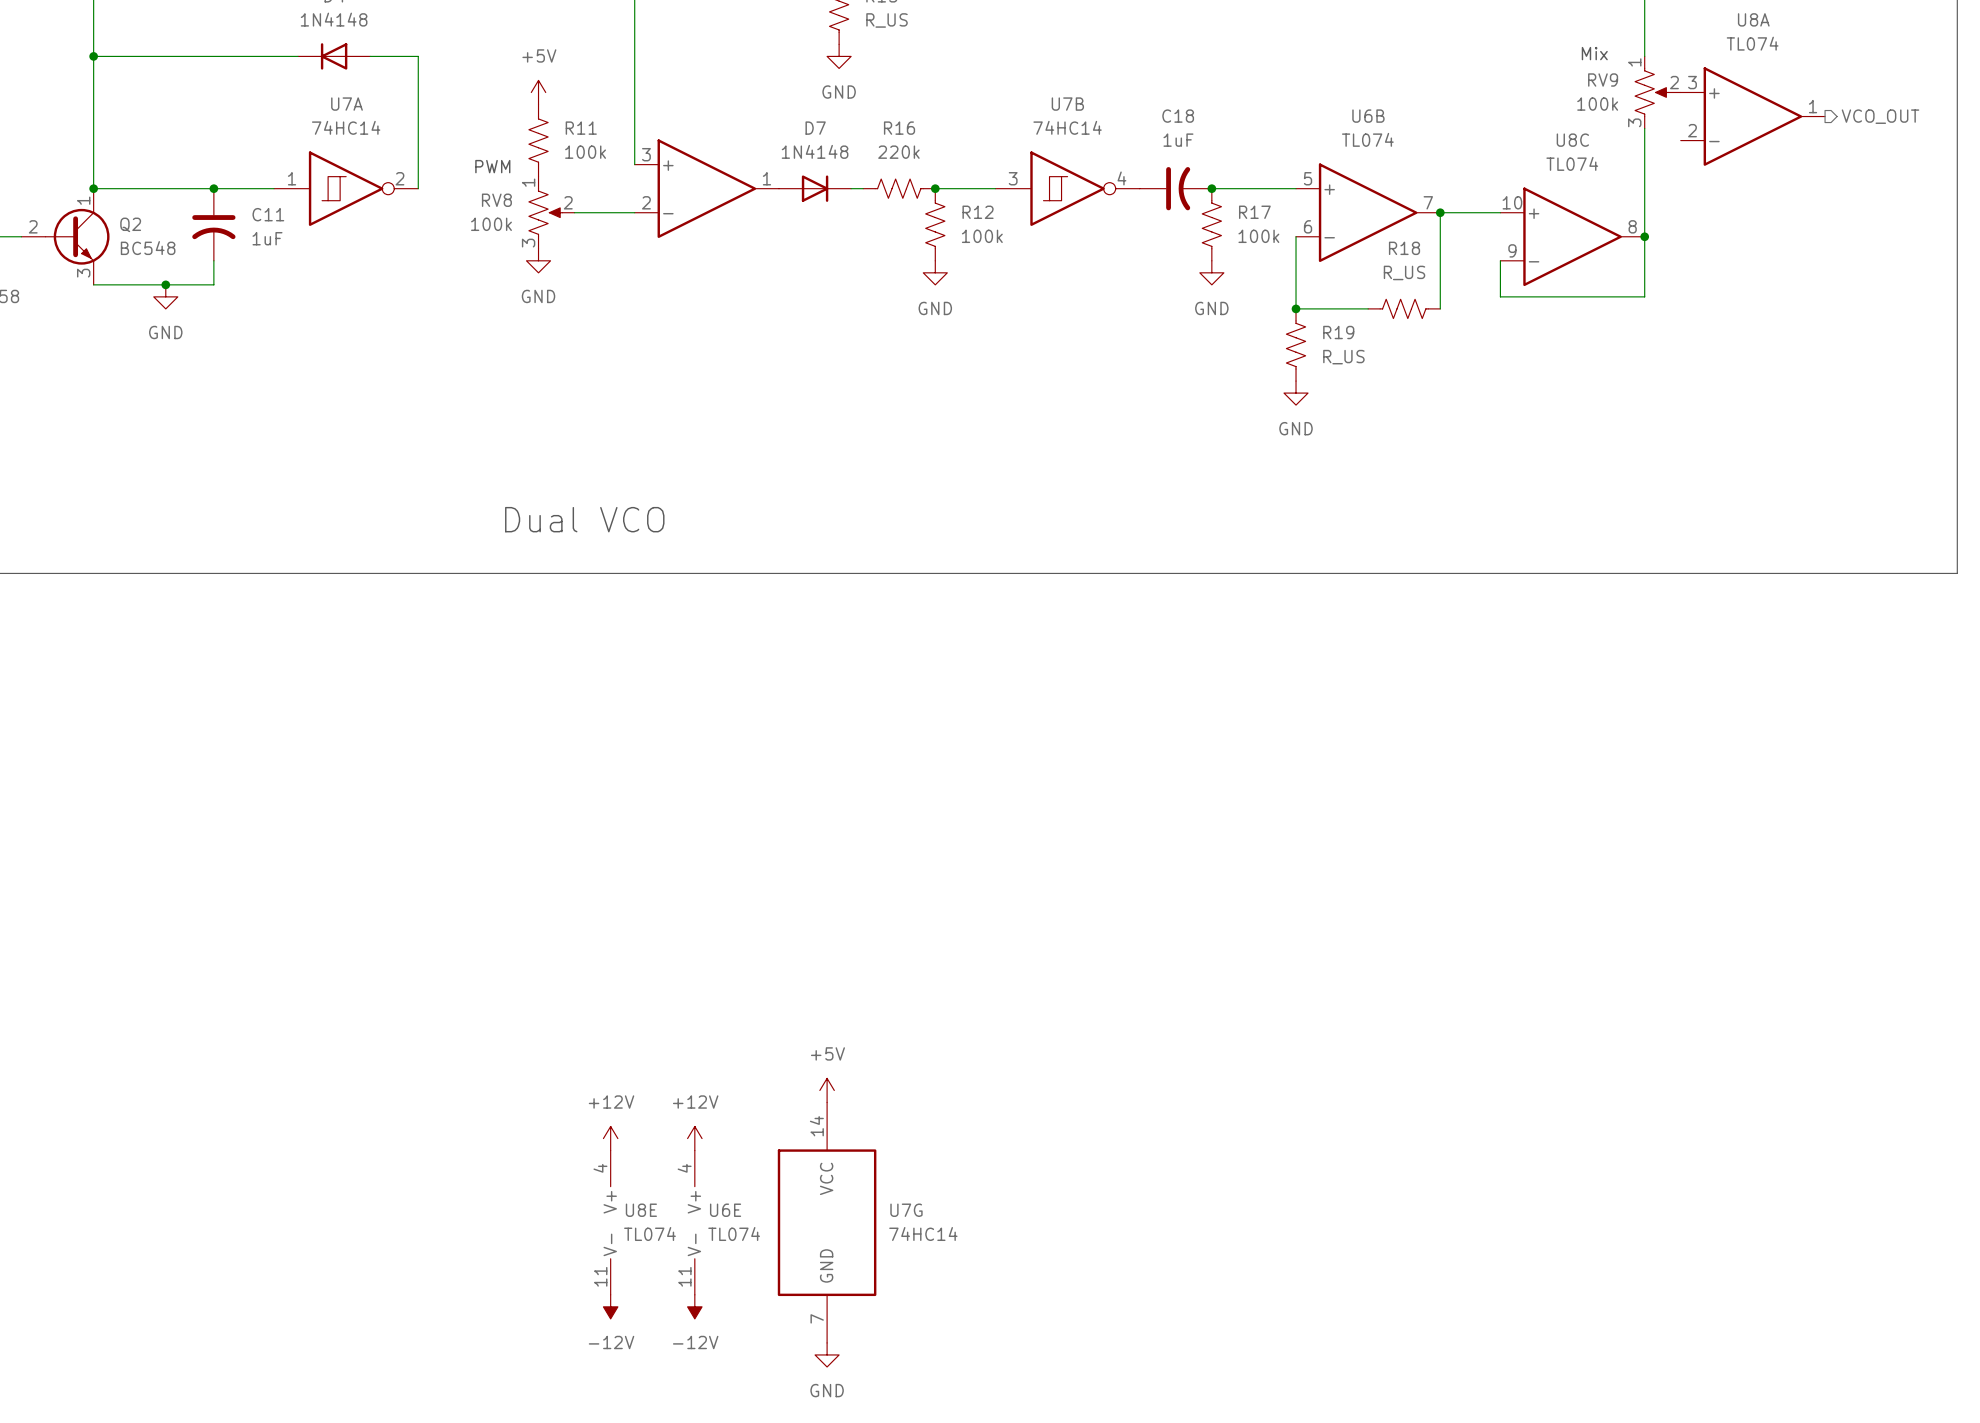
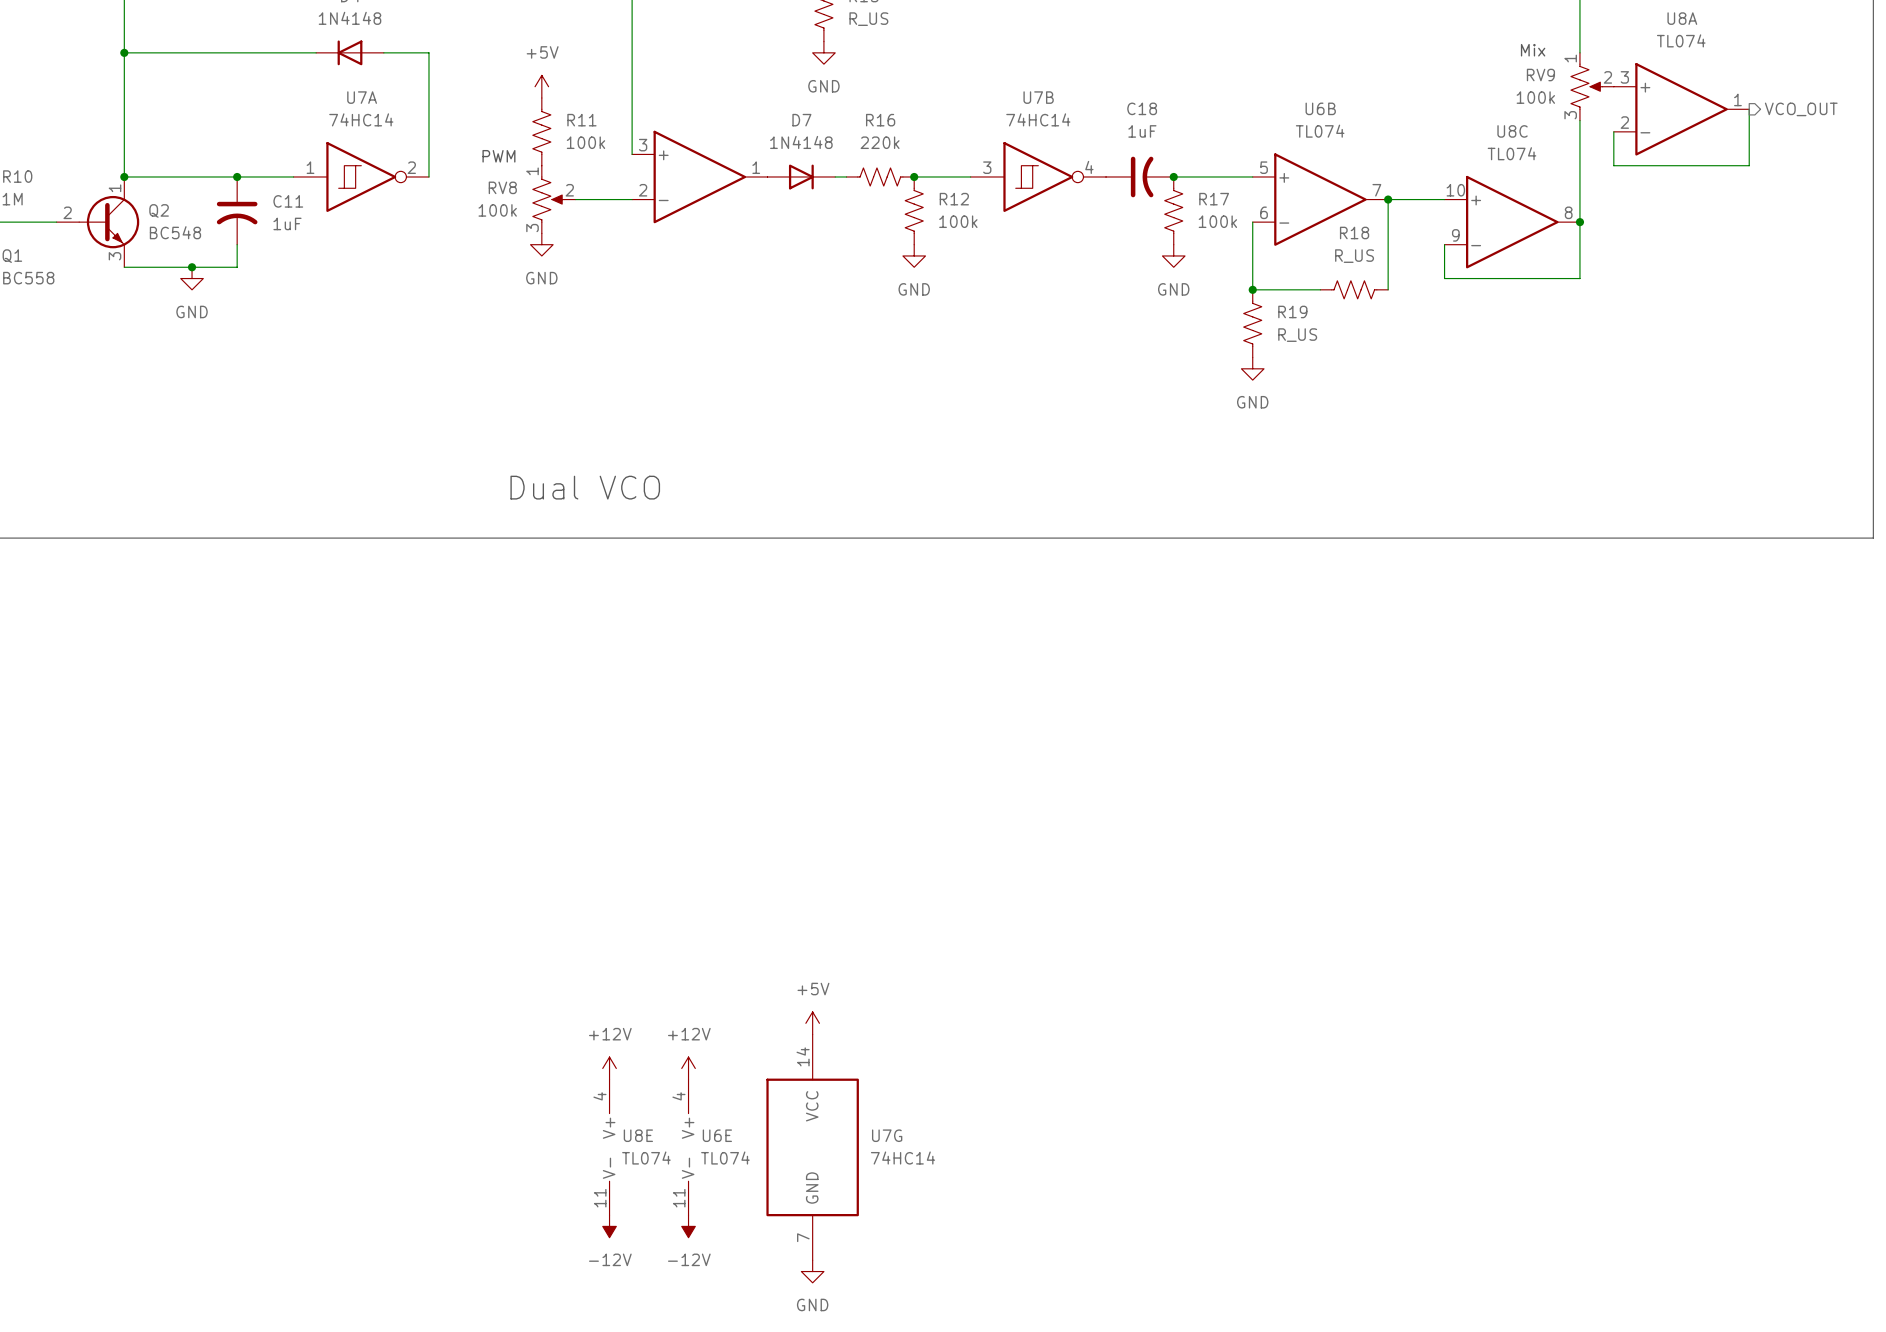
wire: none -> (1749, 109) (1749, 165) (1613, 165) (1613, 131)

